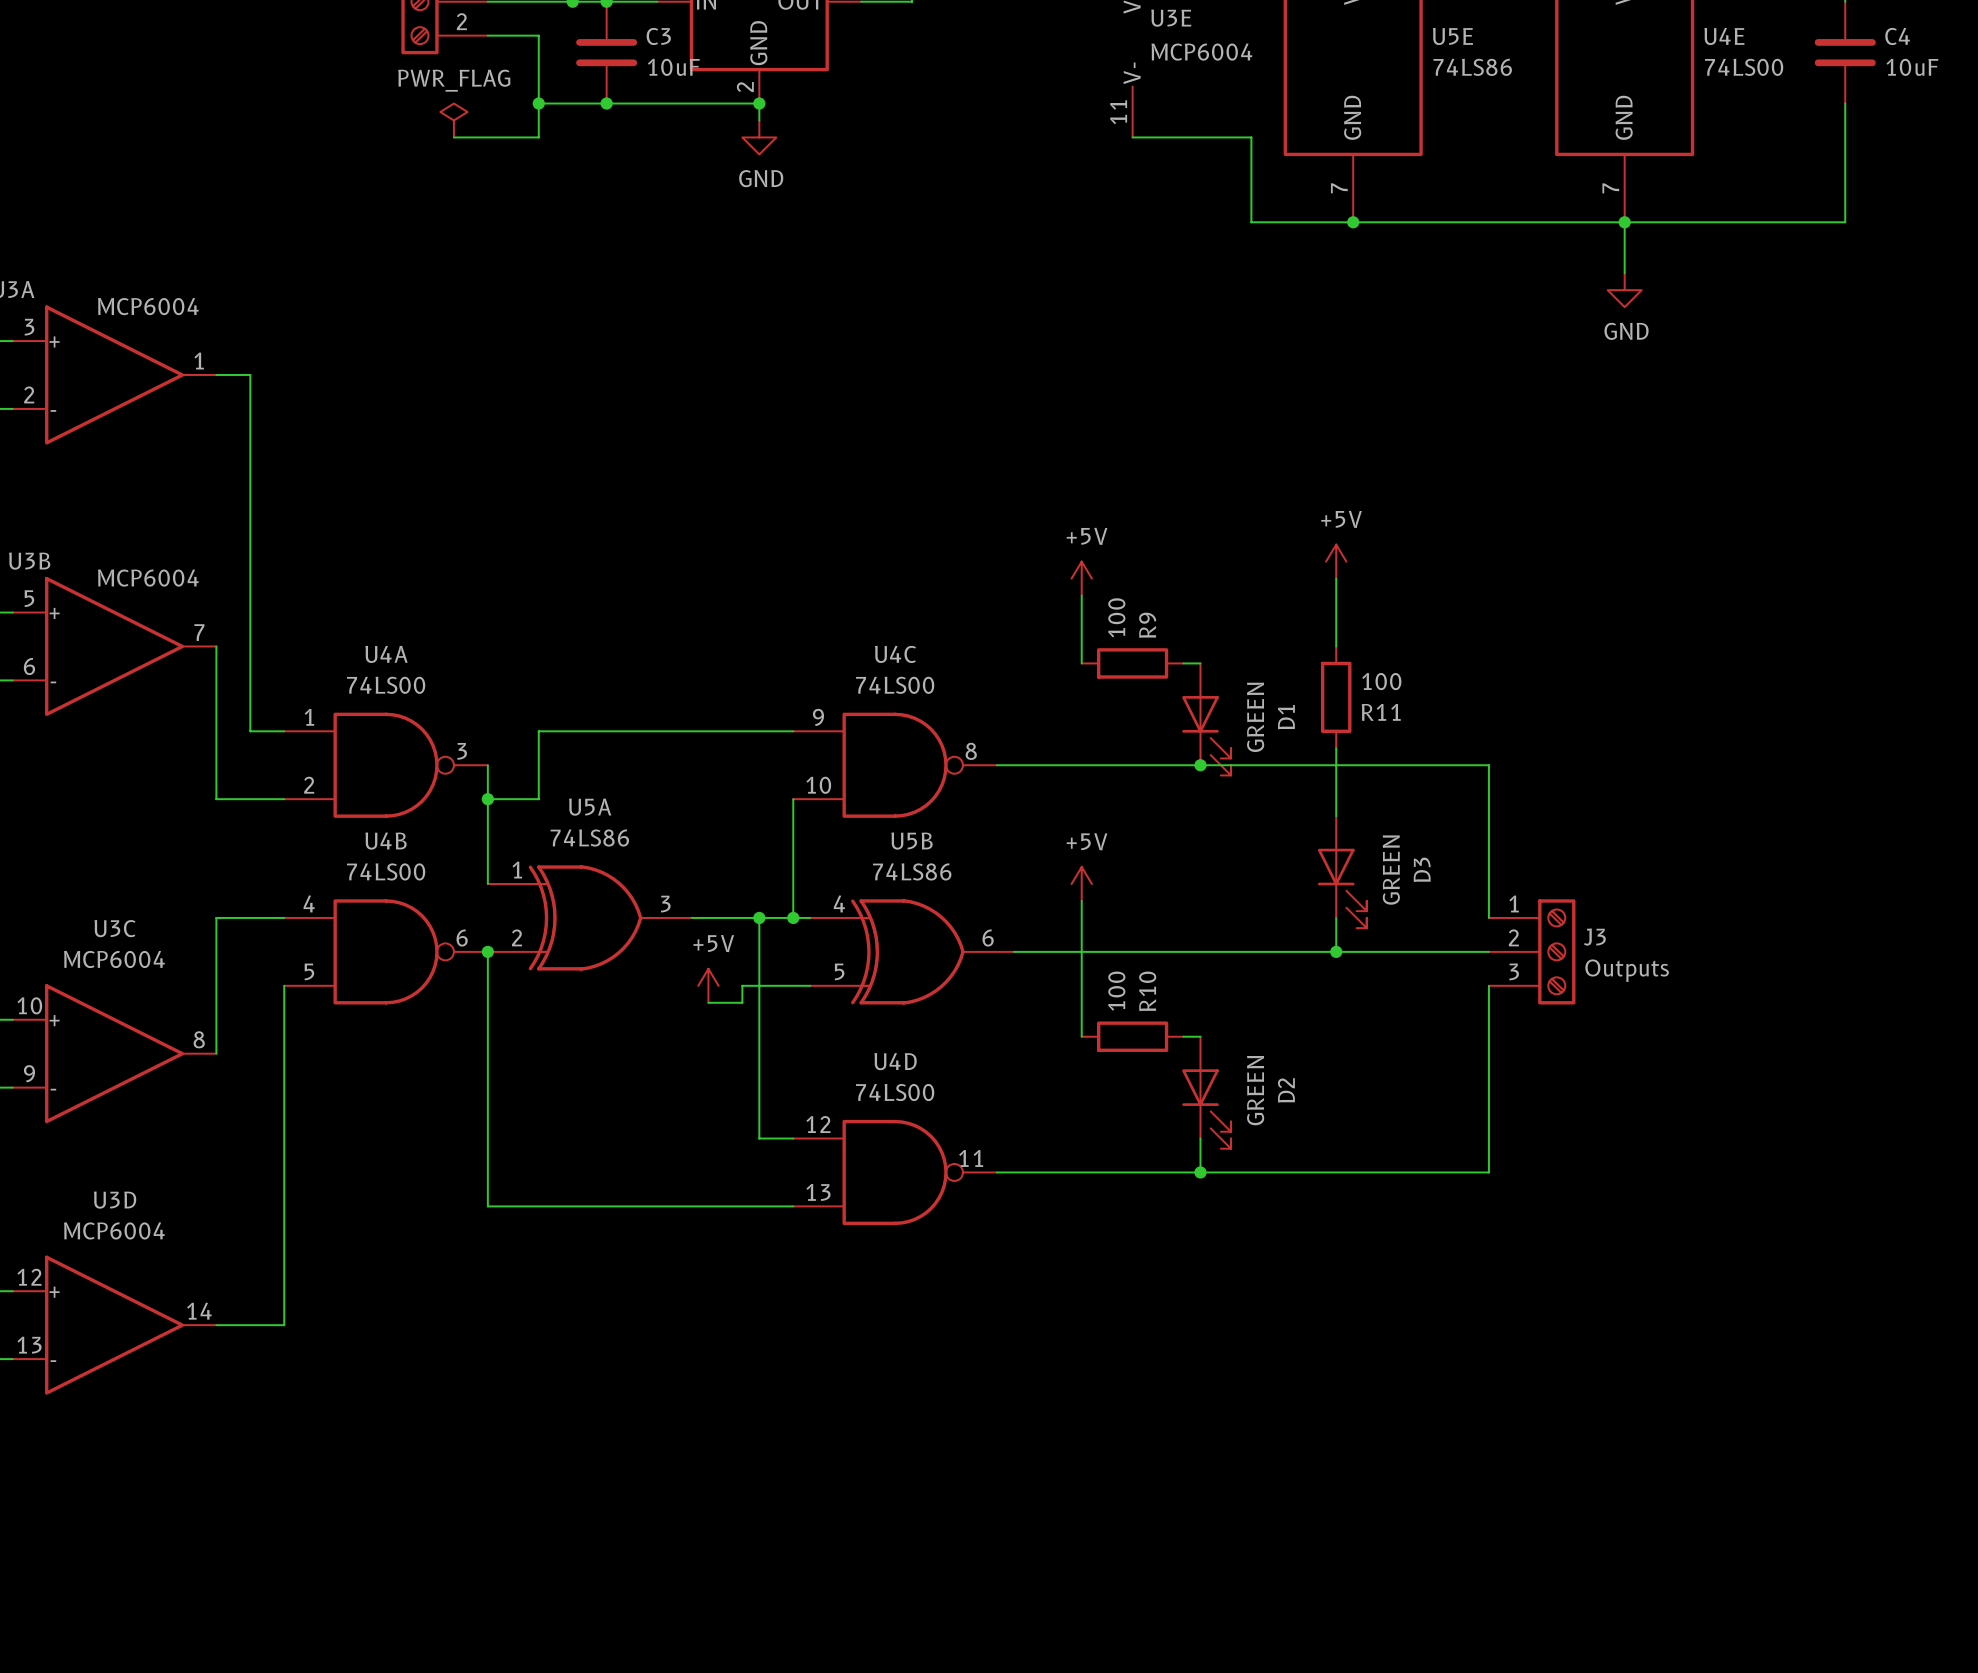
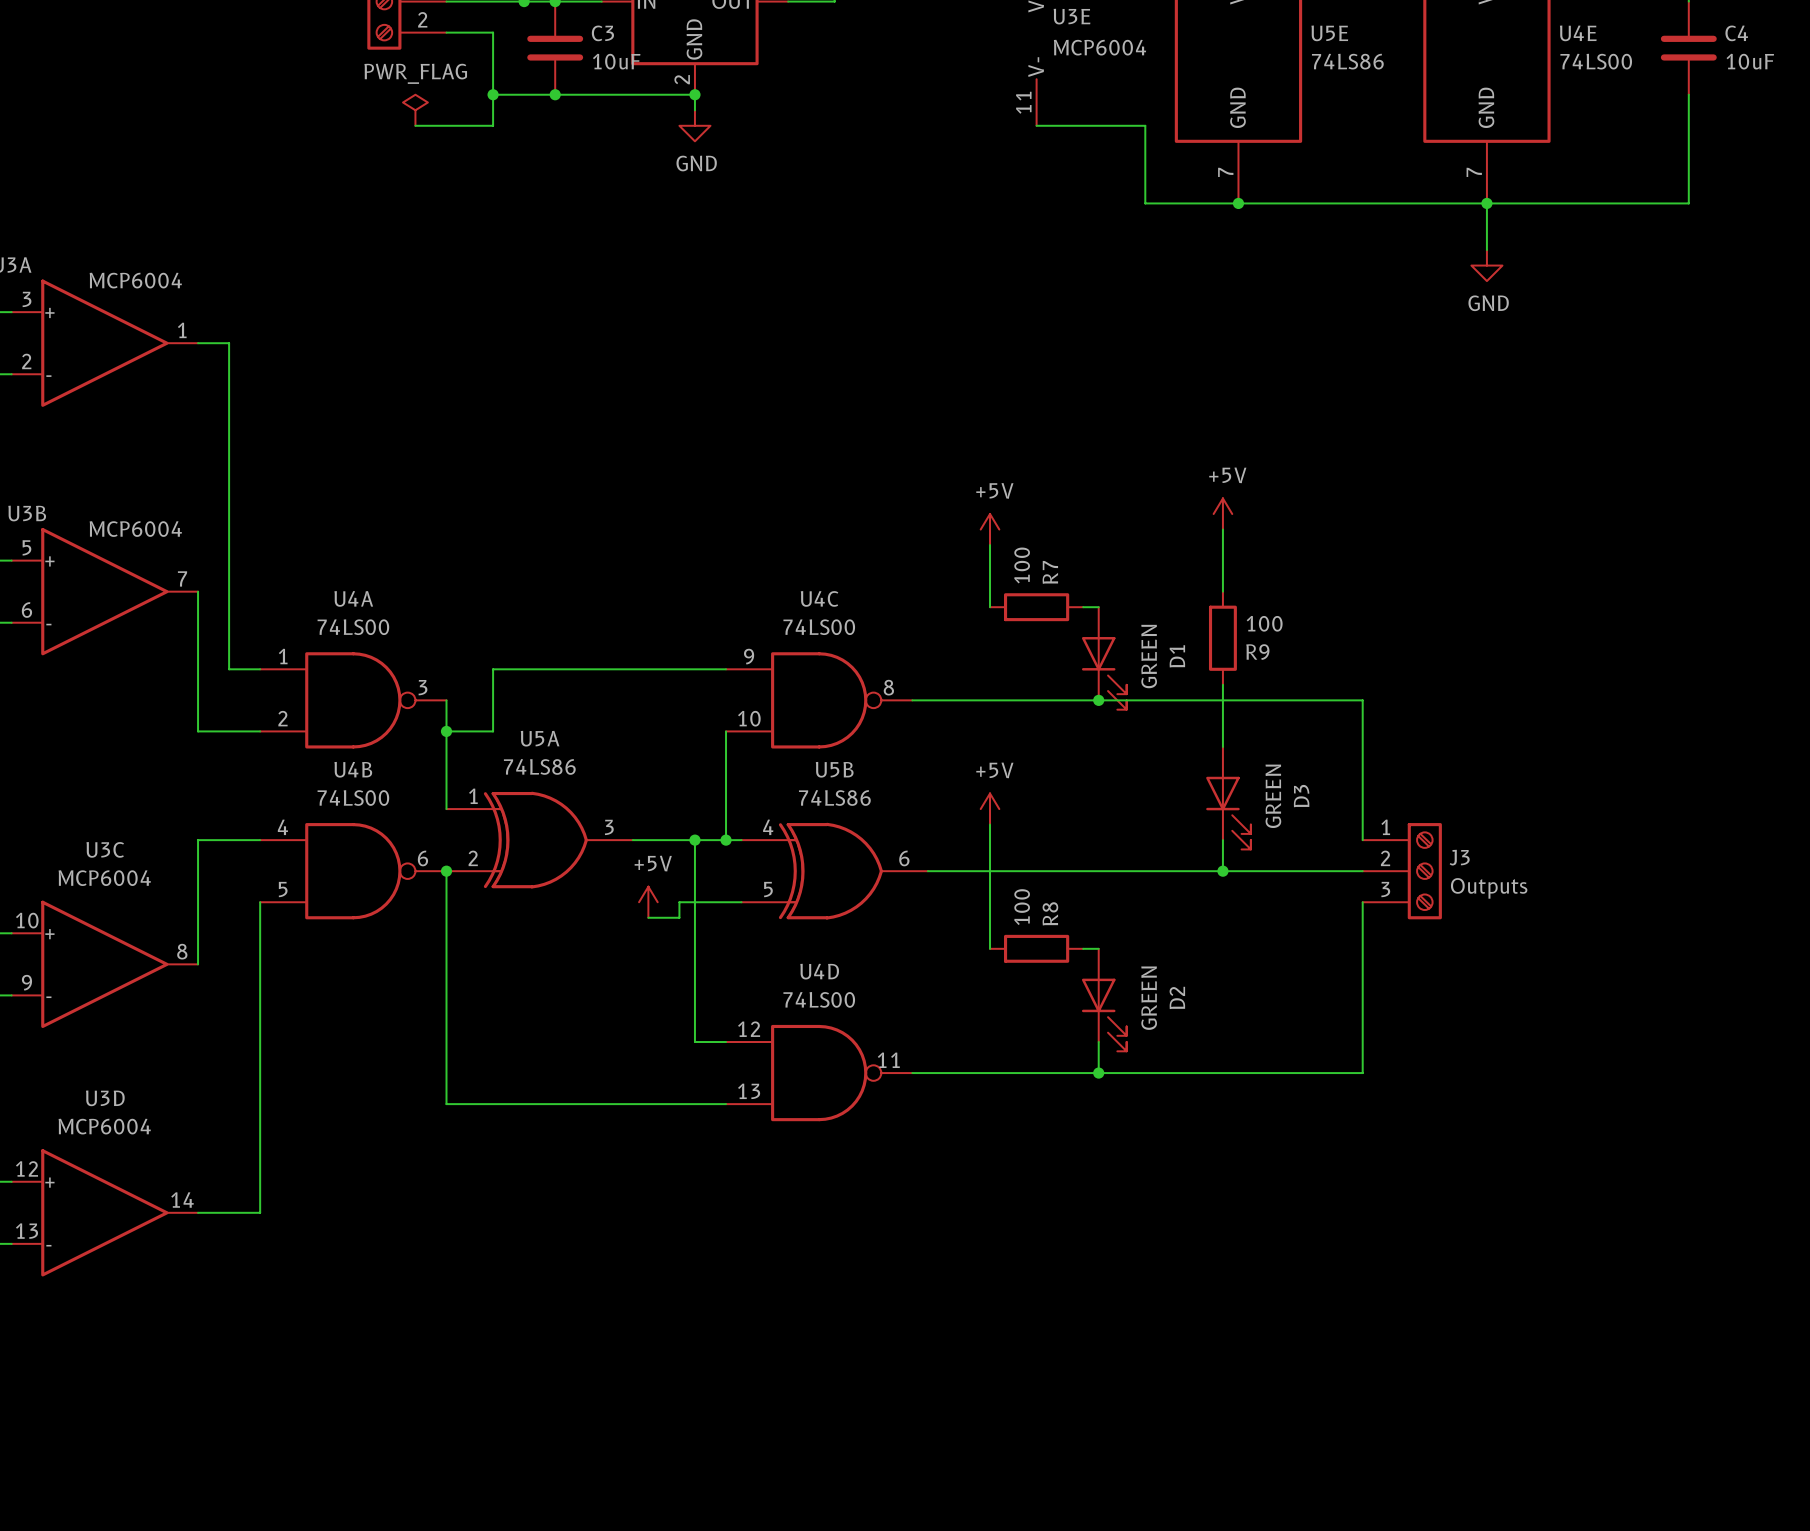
R9 name: R9 (1147, 625) -> R7 (1050, 572)
R11 name: R11 (1381, 712) -> R9 (1257, 652)
R10 name: R10 (1147, 991) -> R8 (1050, 913)

